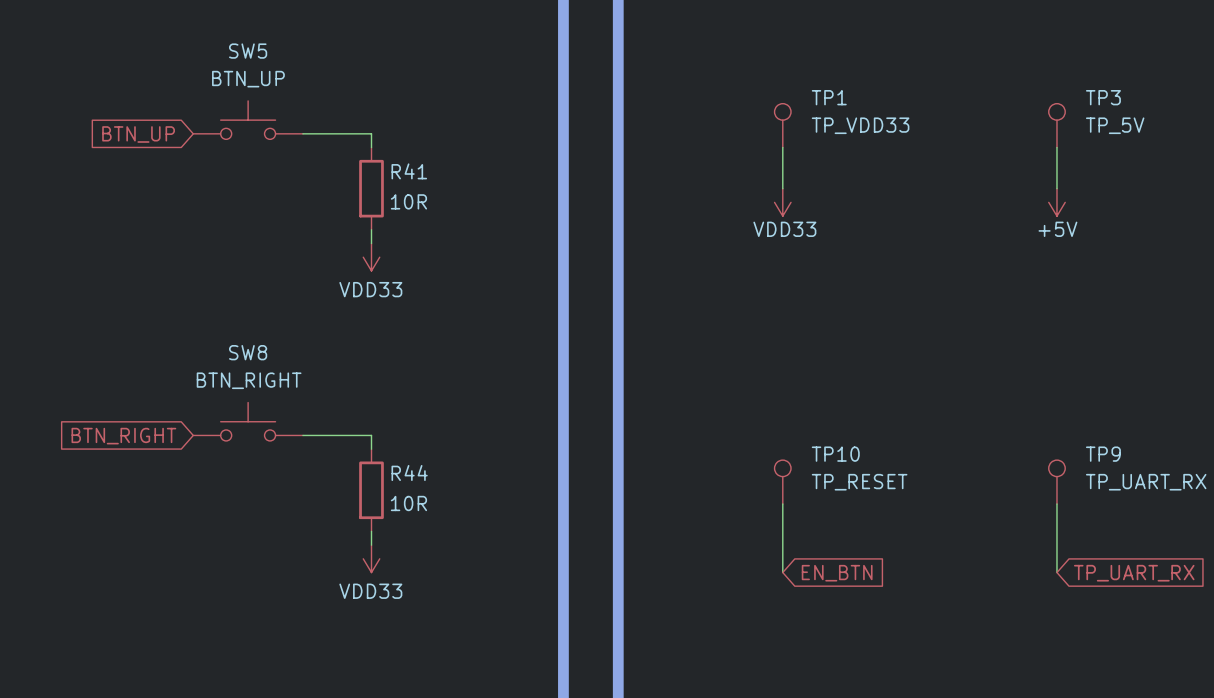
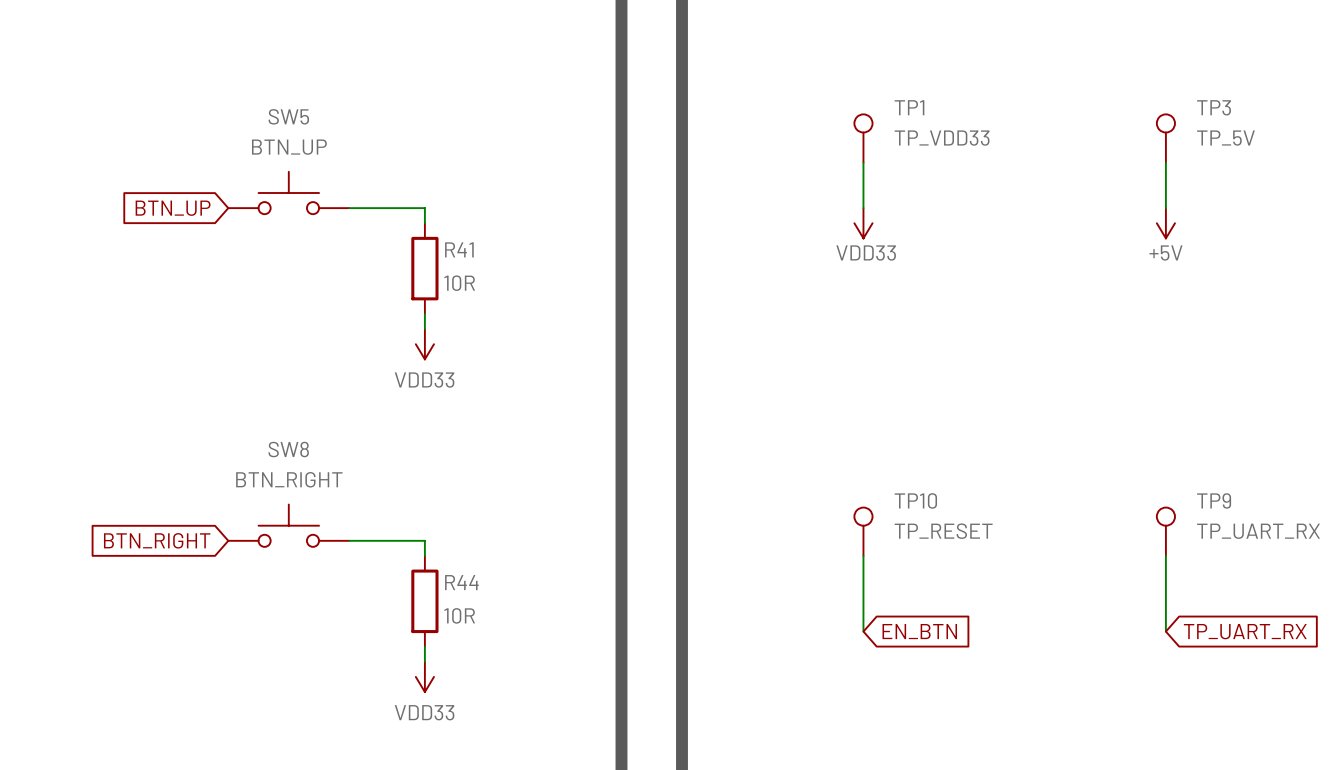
SW5 position: (248, 120) -> (288, 193)
wire: (302, 133) (371, 133) (371, 147) -> (349, 208) (424, 208) (424, 223)
global label position: BTN_UP (138, 134) -> BTN_UP (173, 208)
R41 position: (371, 188) -> (424, 268)
wire: (371, 229) (371, 243) -> (424, 313) (424, 329)
power symbol position: VDD33 (371, 257) -> VDD33 (424, 344)
SW8 position: (248, 421) -> (288, 525)
wire: (302, 435) (371, 435) (371, 449) -> (349, 540) (424, 540) (424, 555)
global label position: BTN_RIGHT (123, 436) -> BTN_RIGHT (157, 540)
R44 position: (371, 490) -> (424, 601)
wire: (371, 531) (371, 545) -> (424, 646) (424, 661)
power symbol position: VDD33 (371, 558) -> VDD33 (424, 676)

